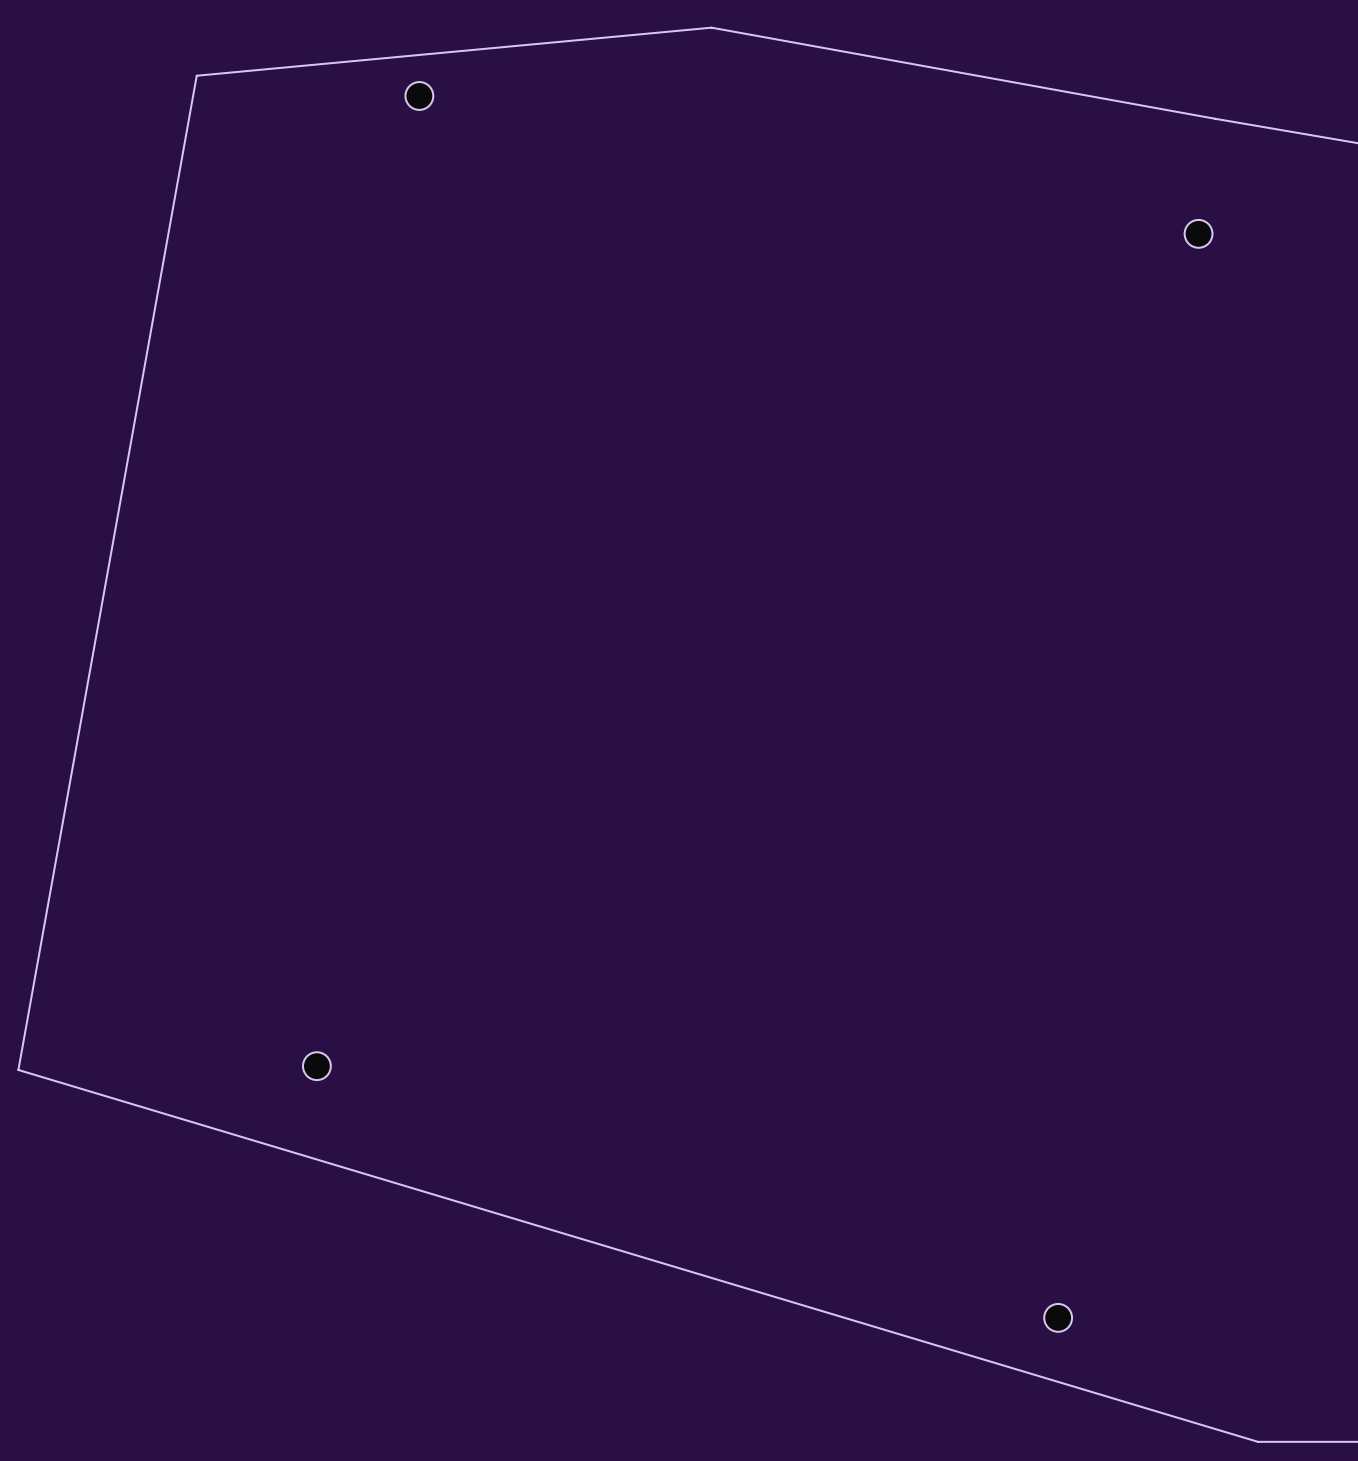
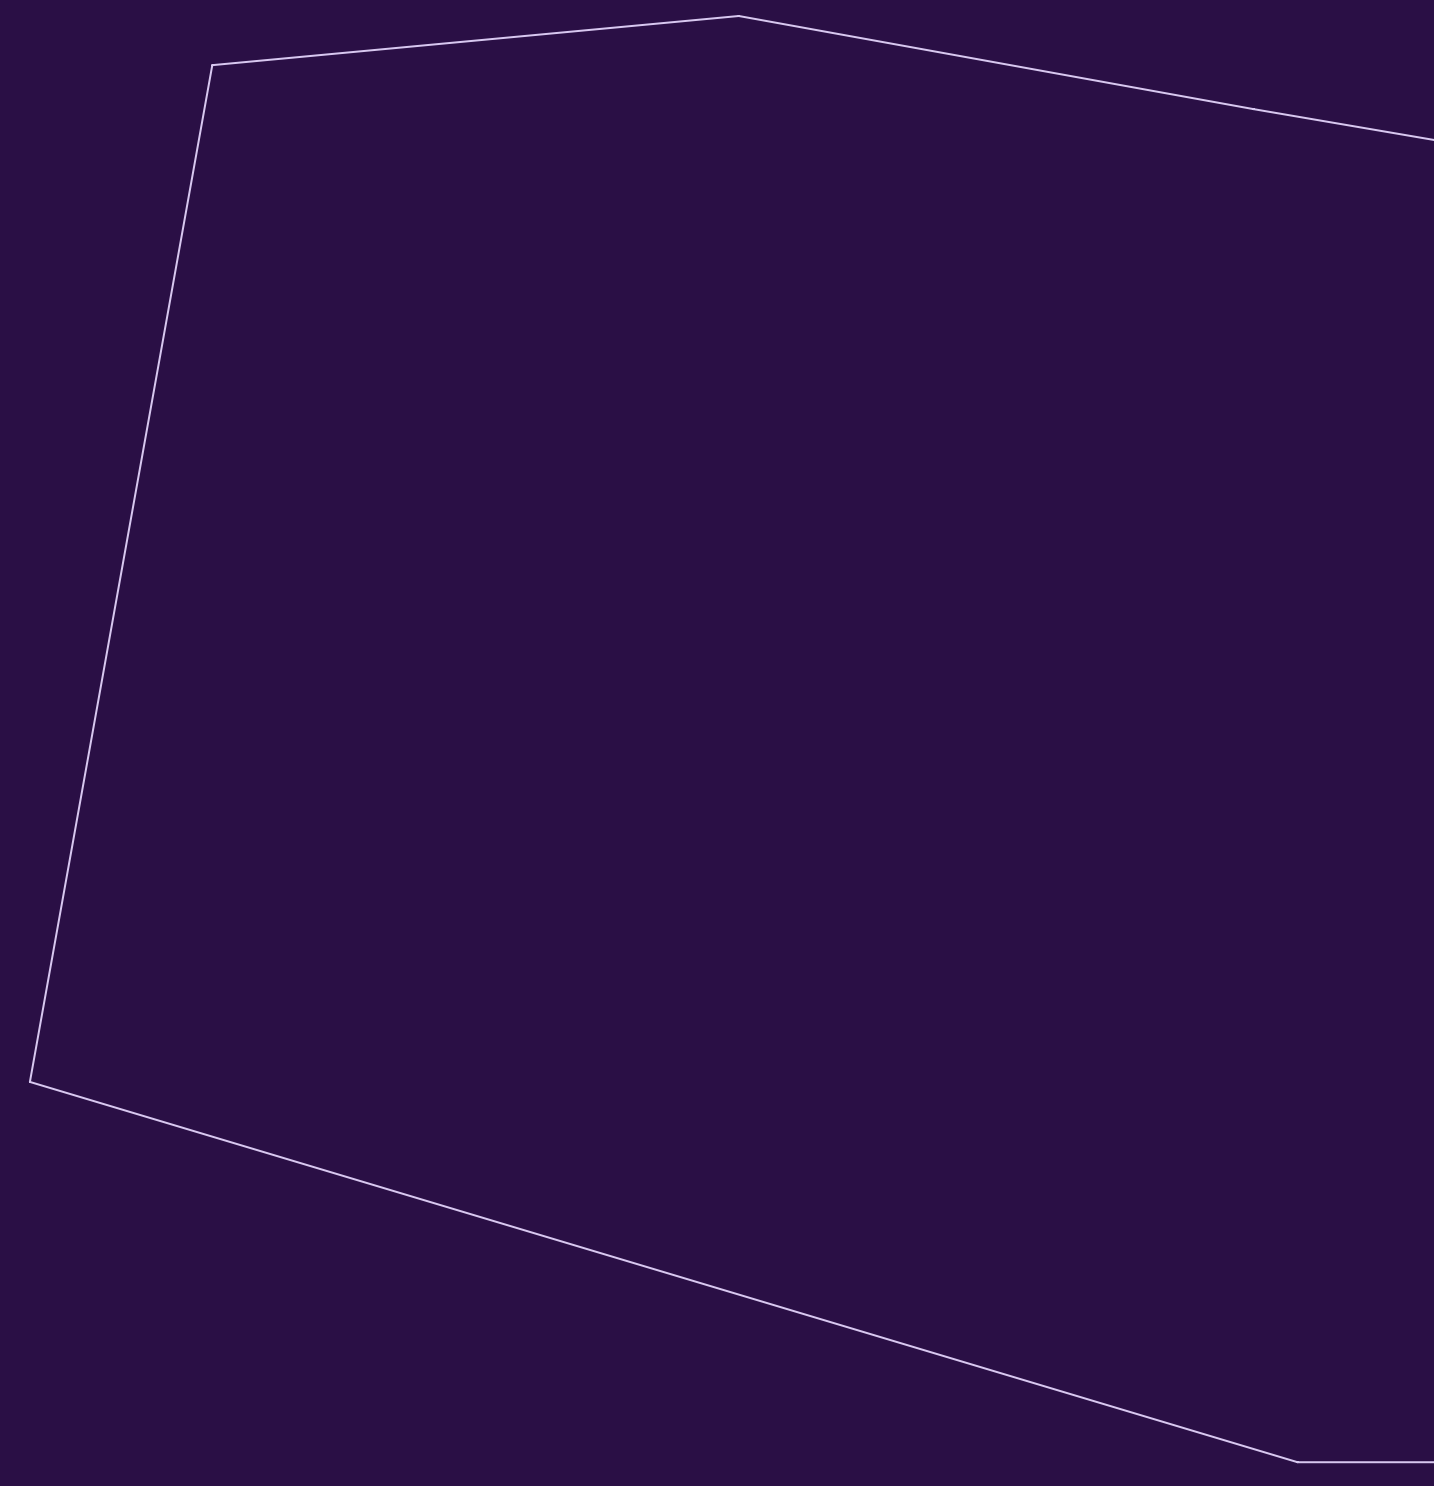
part: (419, 95) -> none
part: (1198, 233) -> none
part: (316, 1066) -> none
part: (1058, 1317) -> none

